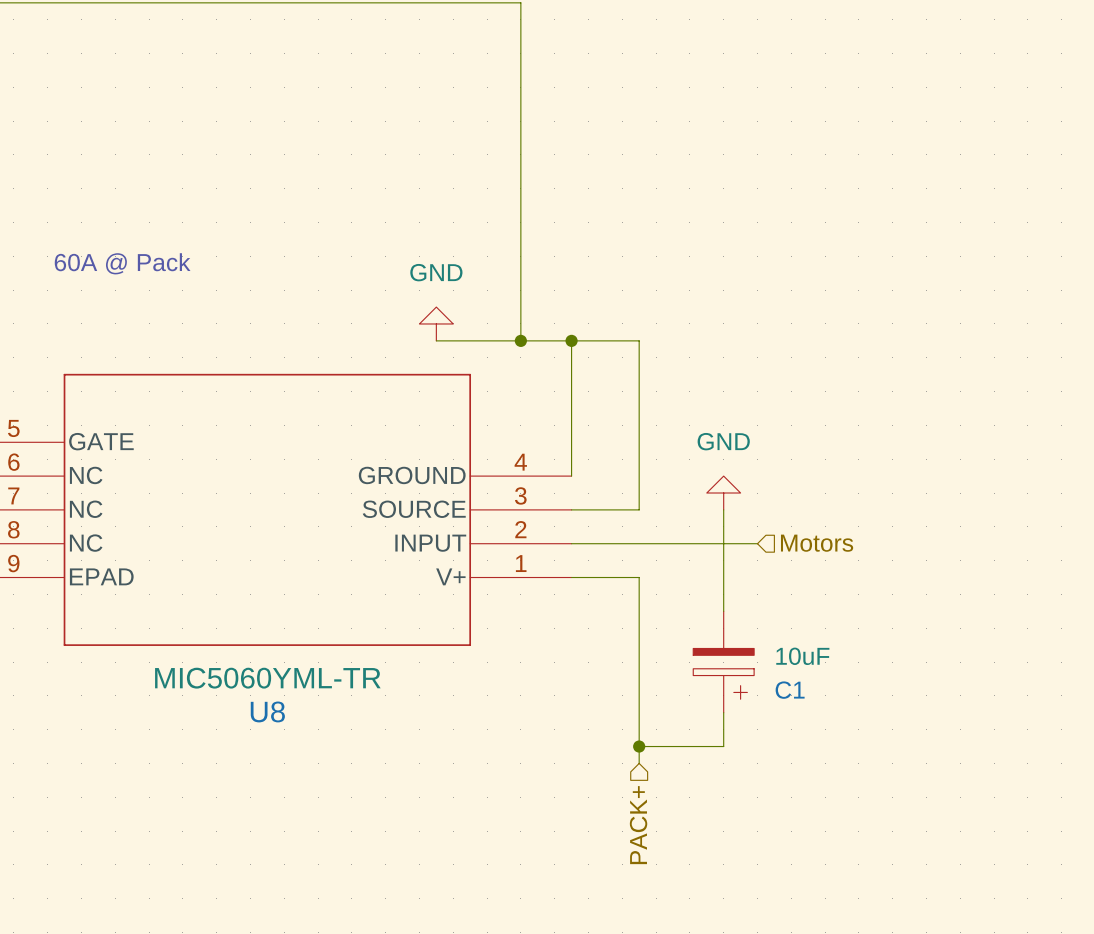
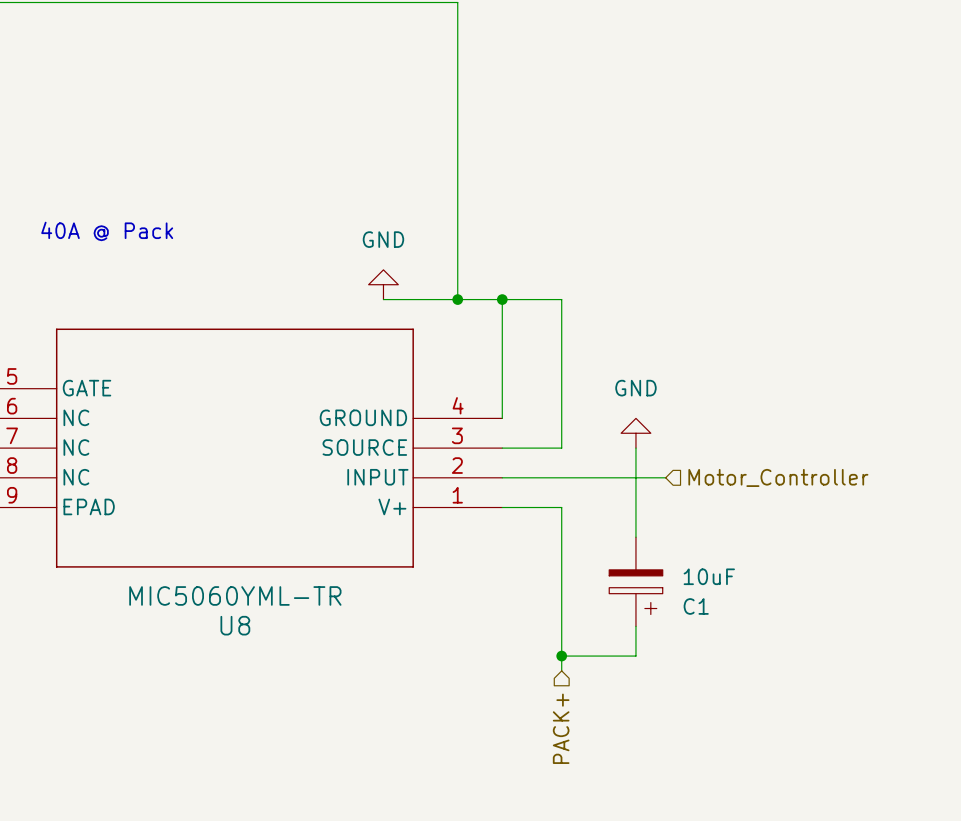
text: 60A @ Pack (122, 263) -> 40A @ Pack (107, 231)
hierarchical label: Motors (817, 543) -> Motor_Controller (778, 477)

